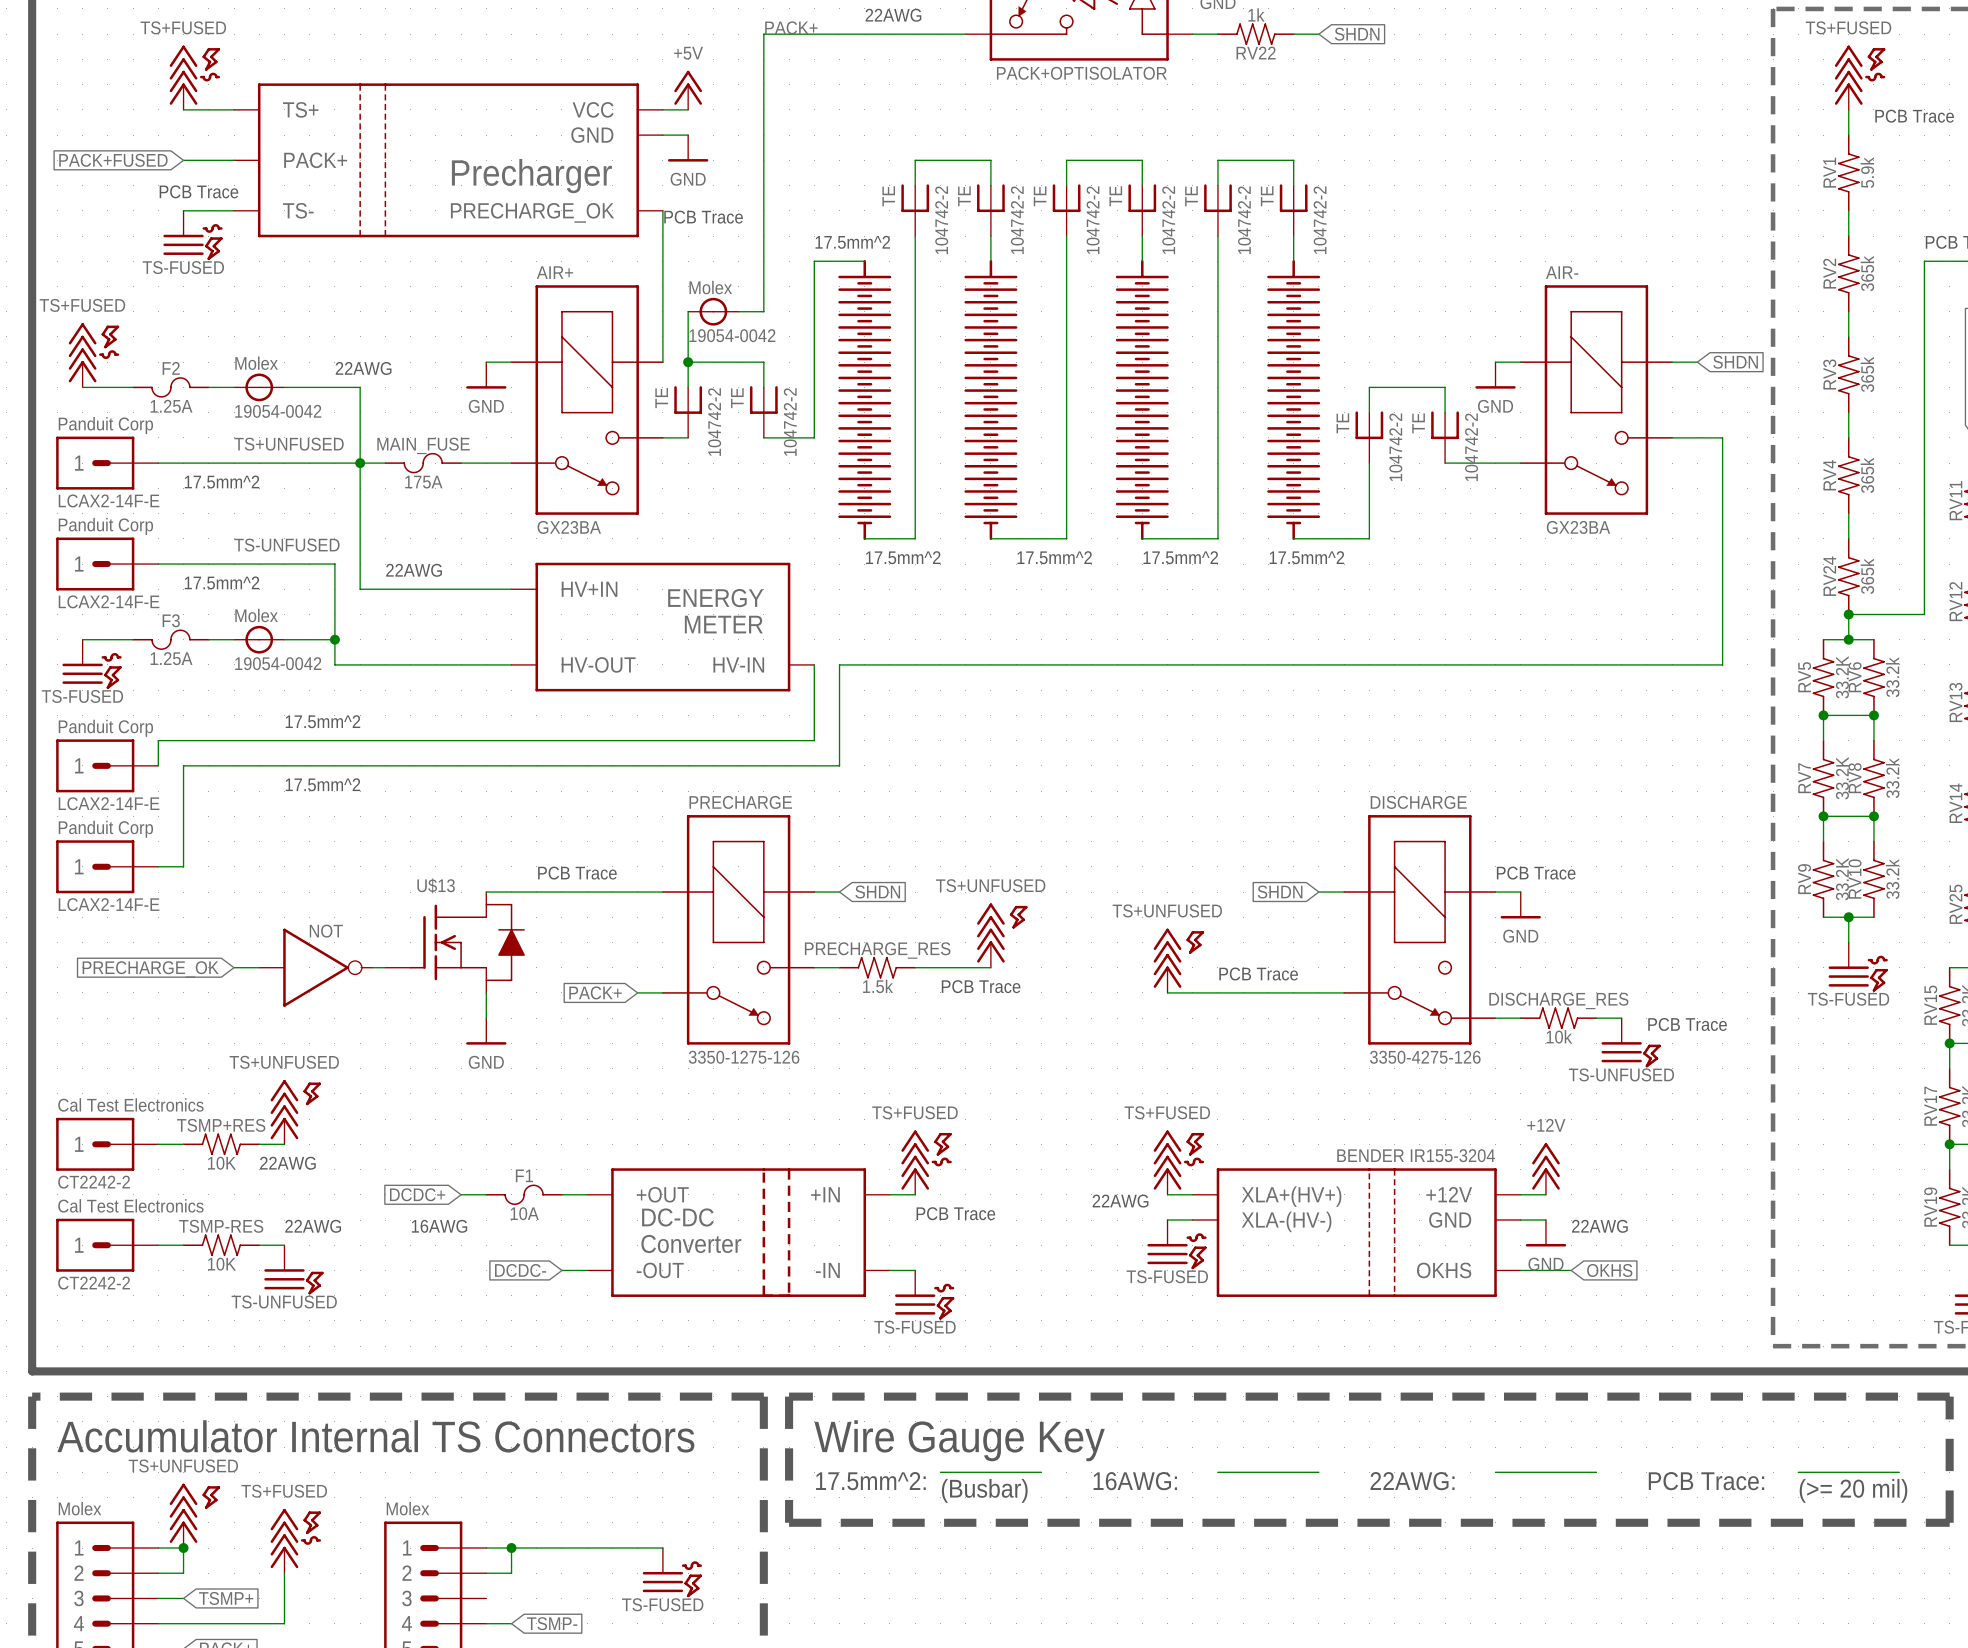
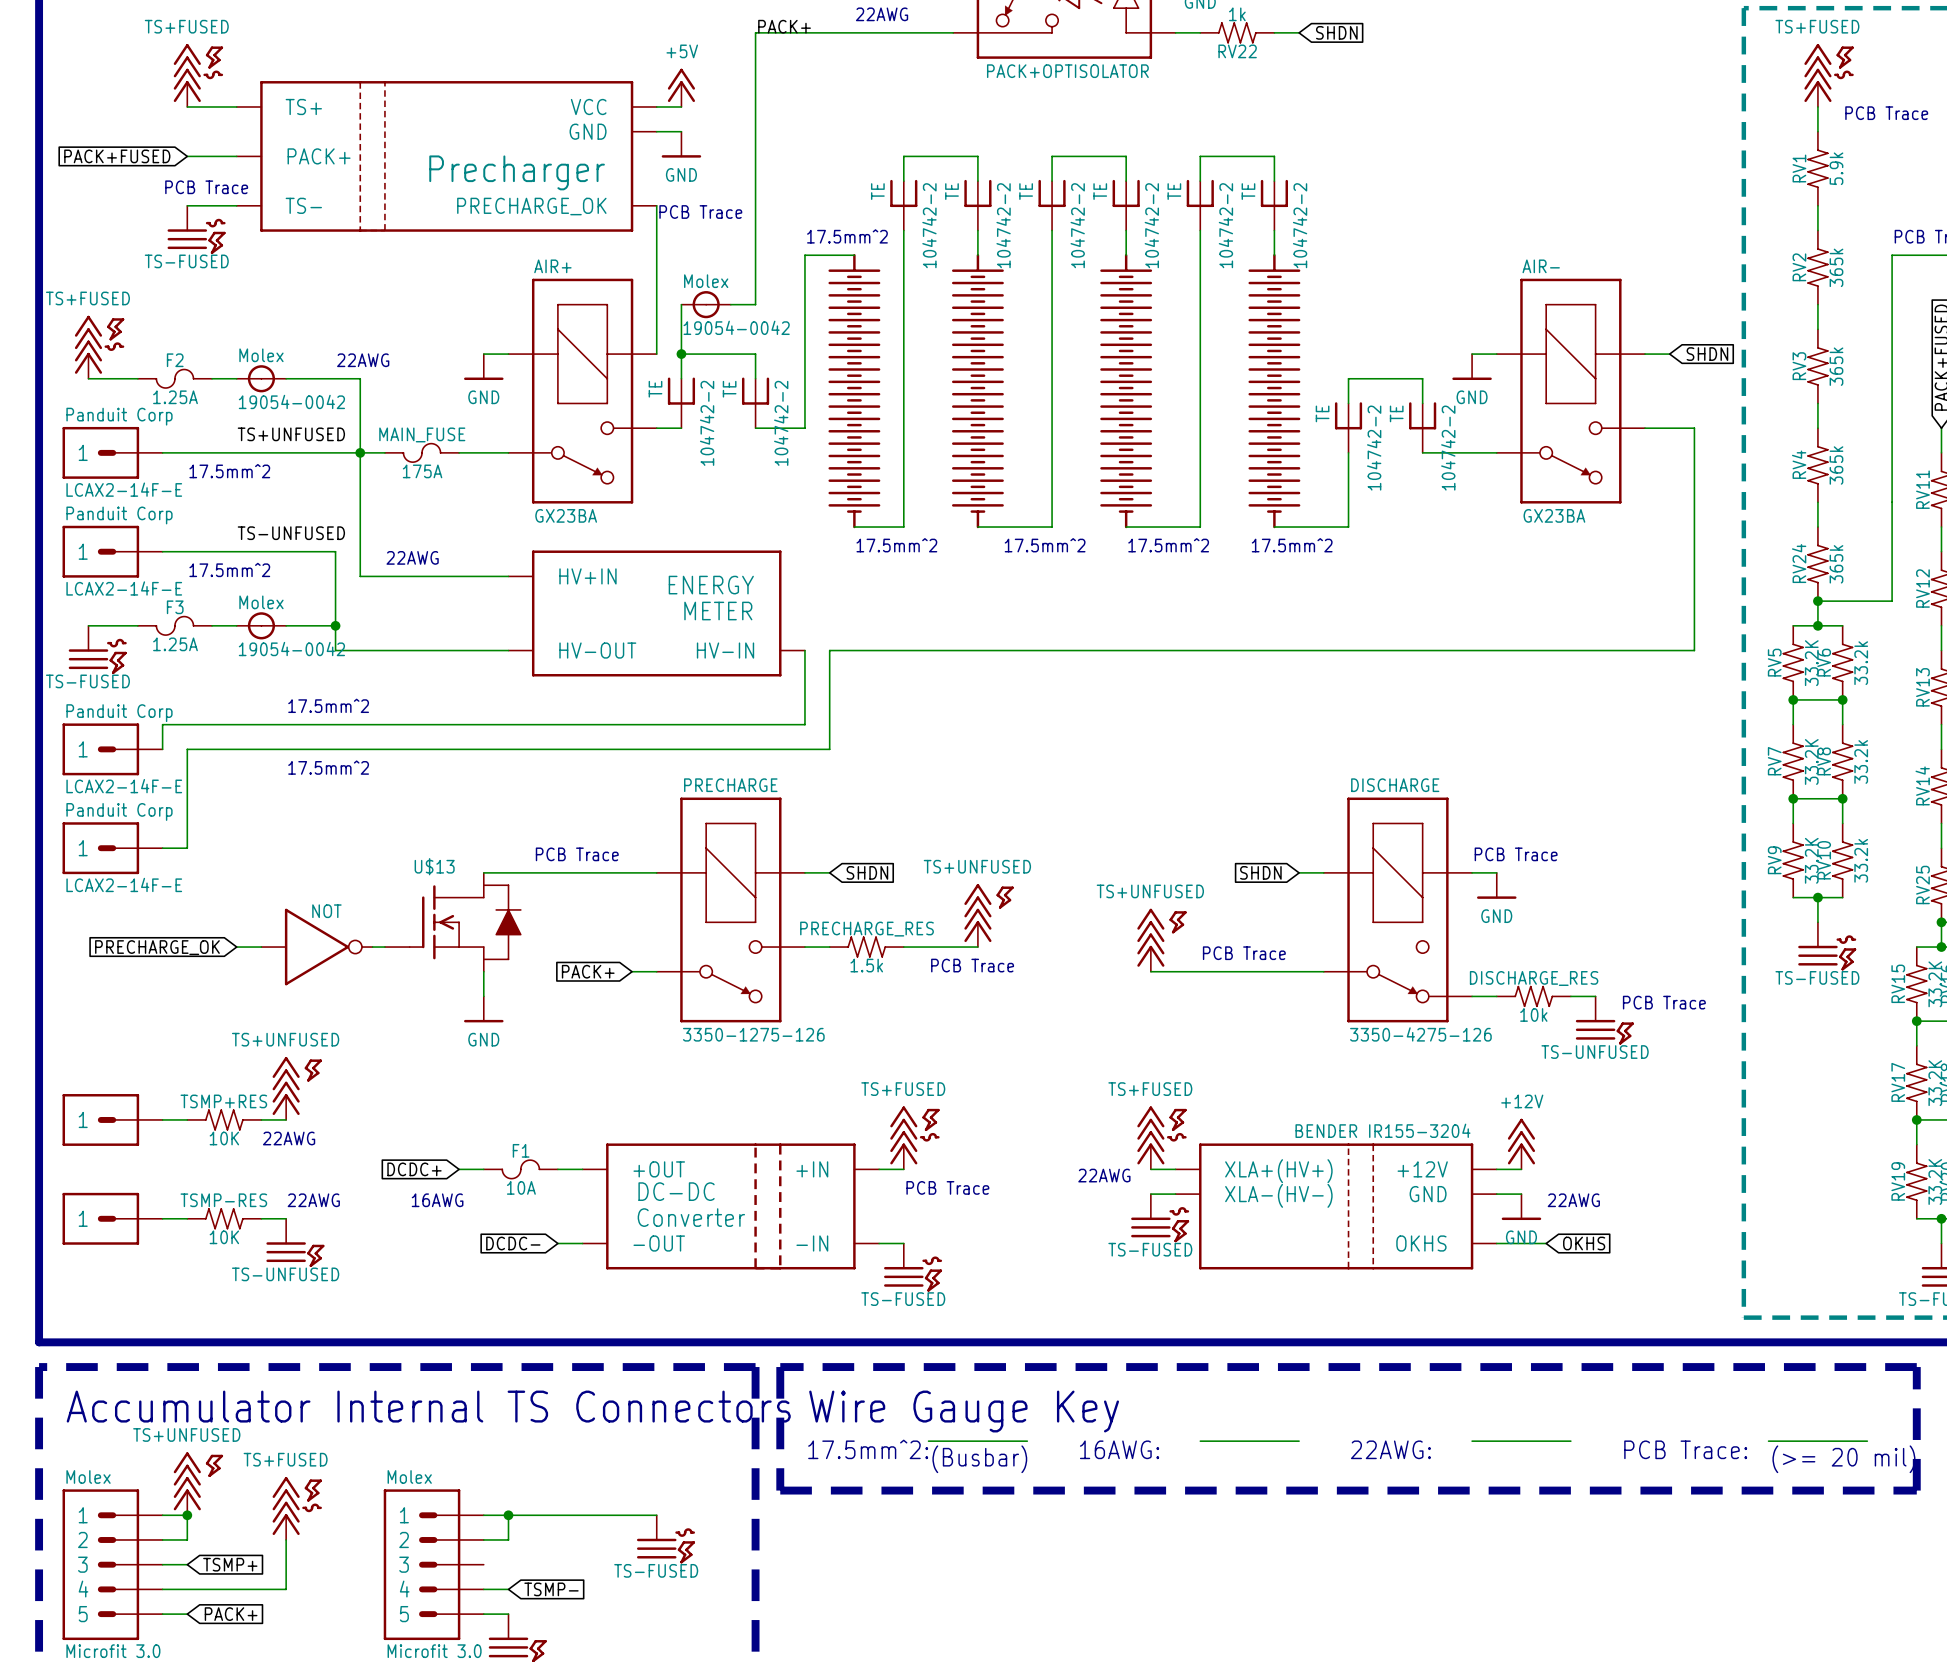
part text: Cal Test Electronics (130, 1104) -> none
part text: CT2242-2 (94, 1182) -> none
part text: Cal Test Electronics (130, 1205) -> none
part text: CT2242-2 (94, 1283) -> none

